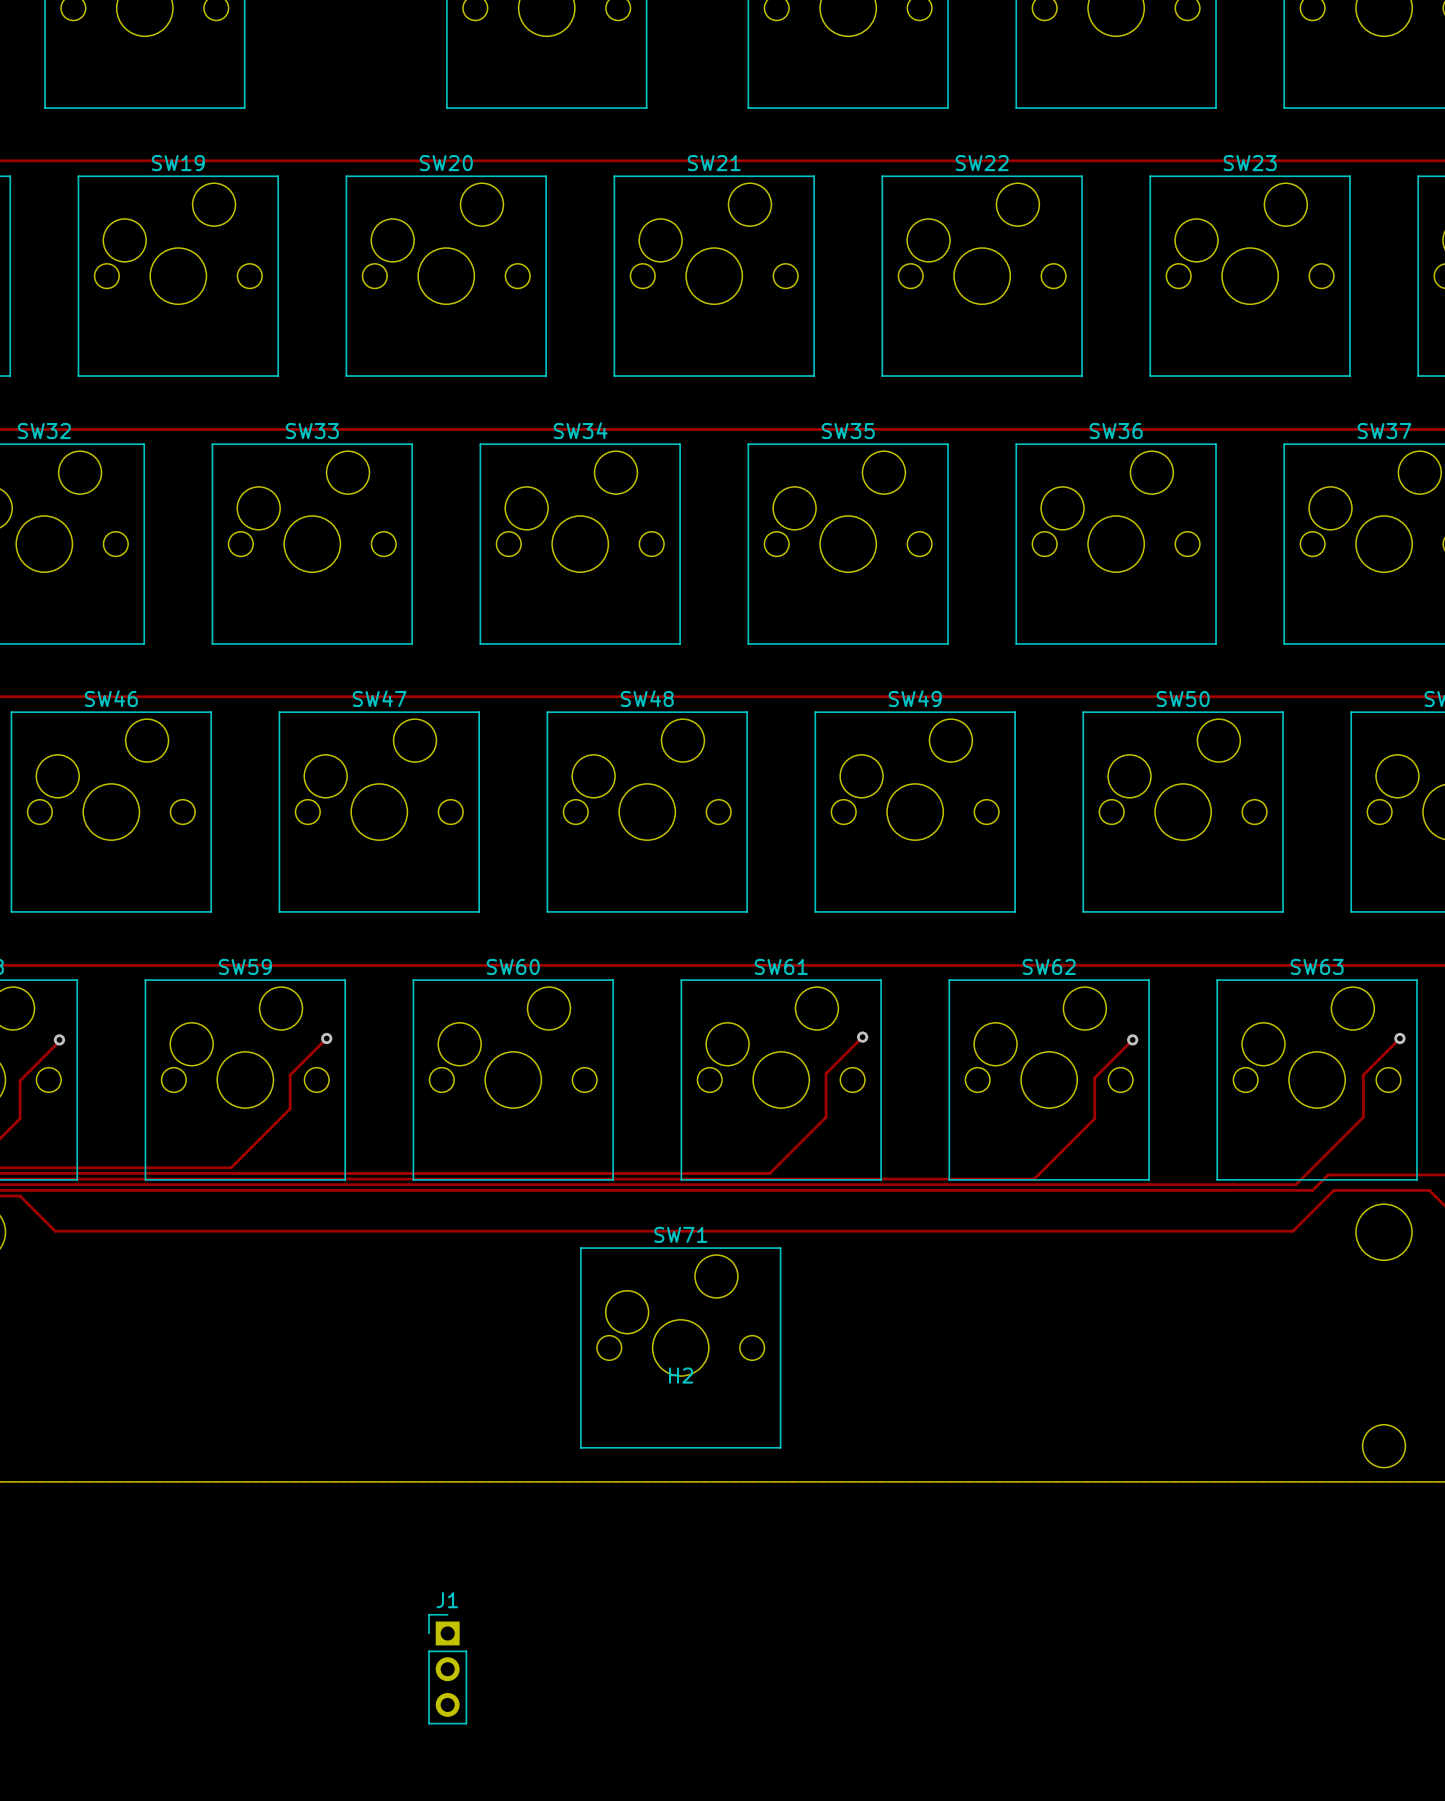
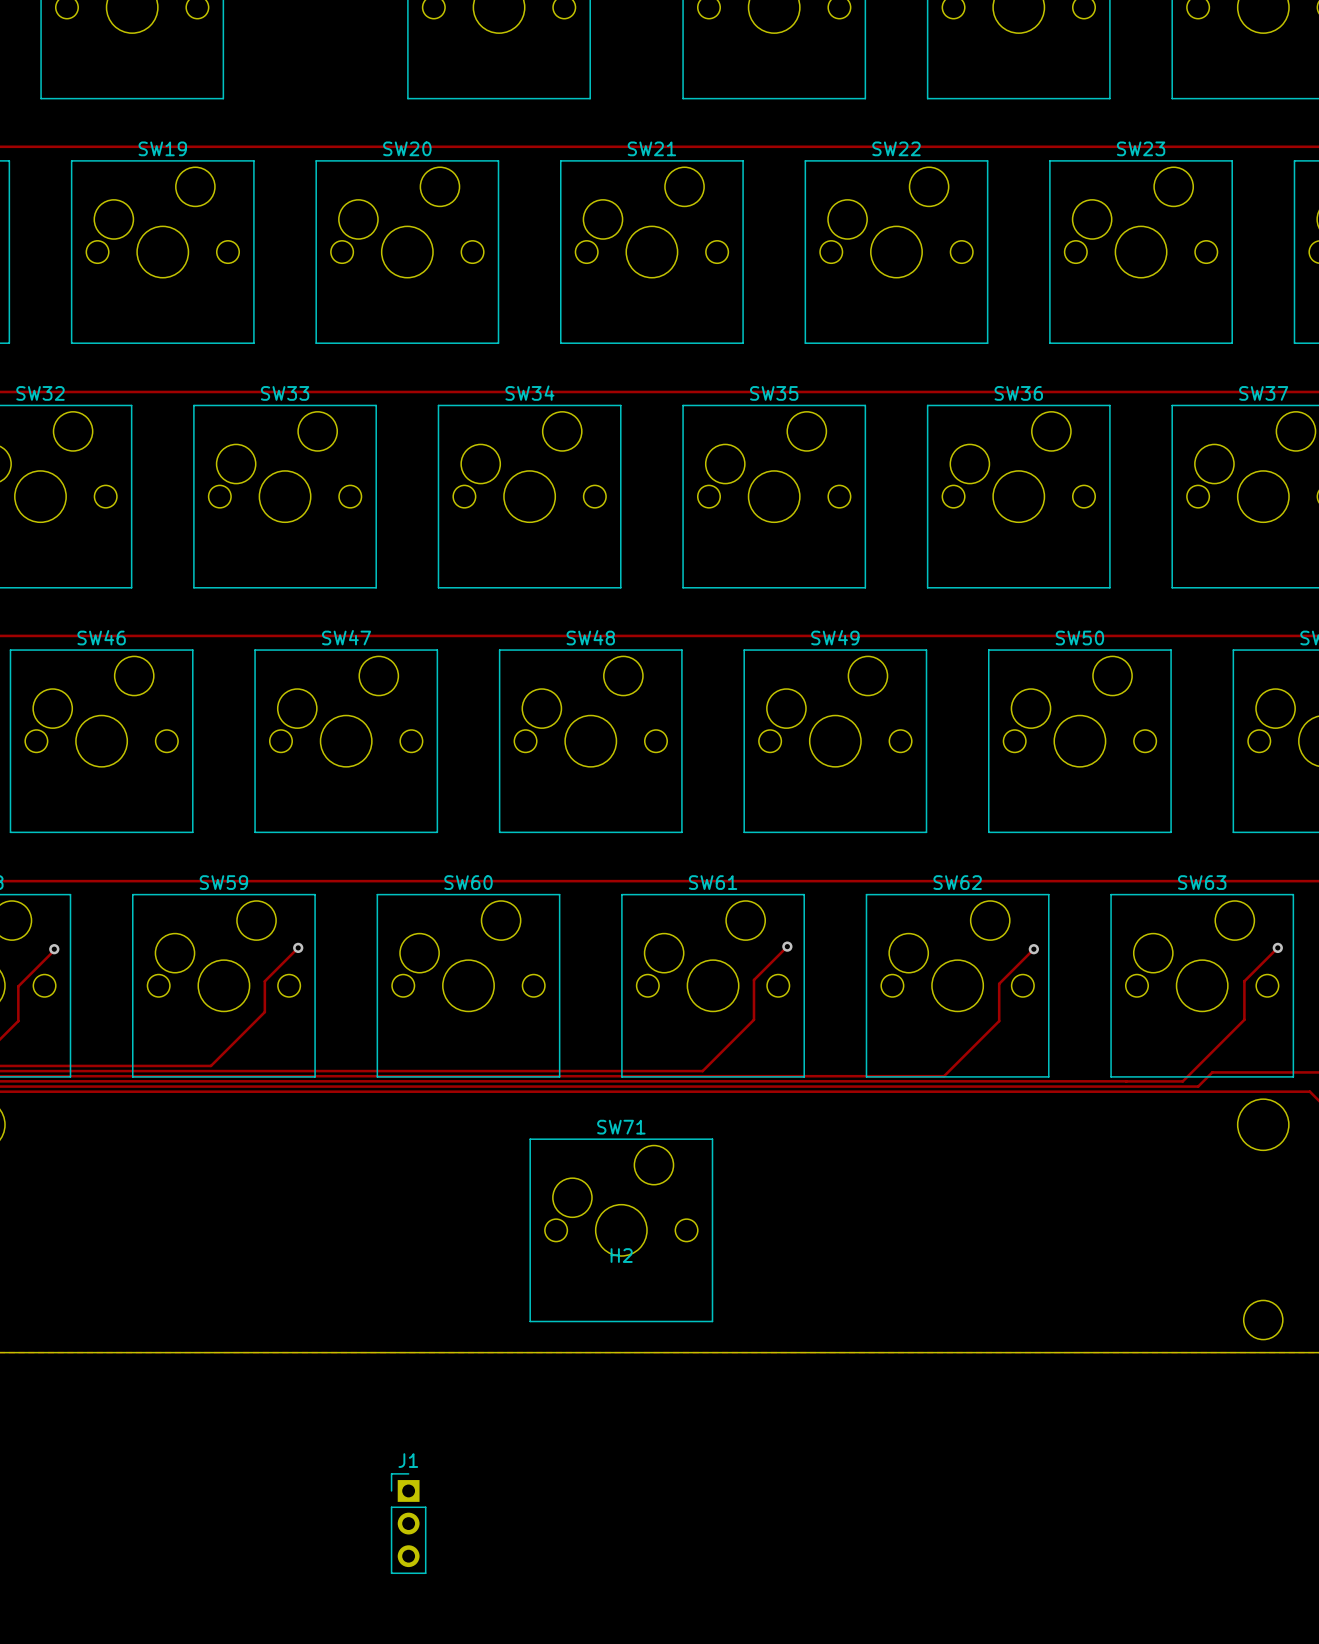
track: (20, 1196) (55, 1231) (1293, 1231) (1333, 1190) (1429, 1190) (1435, 1196) -> (18, 1091) (1309, 1091)

